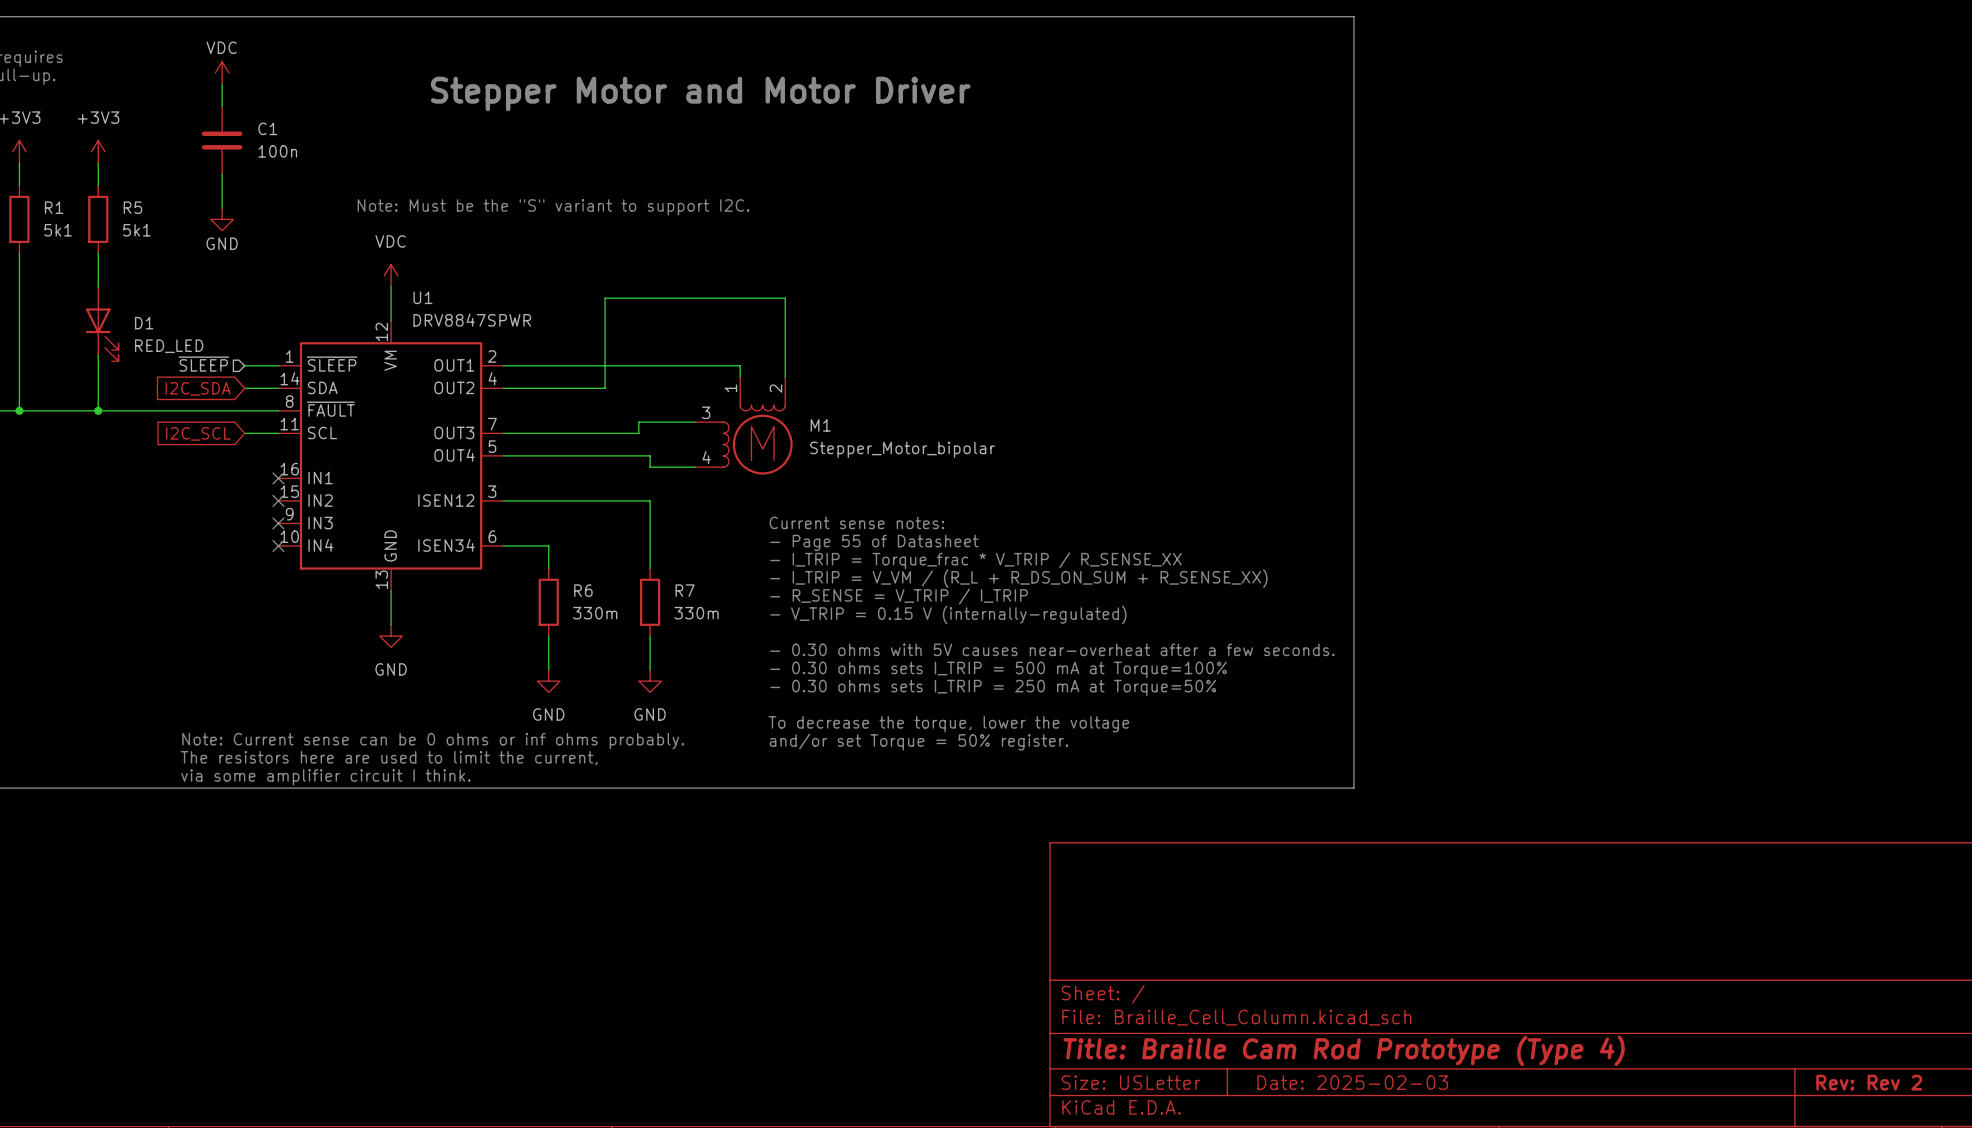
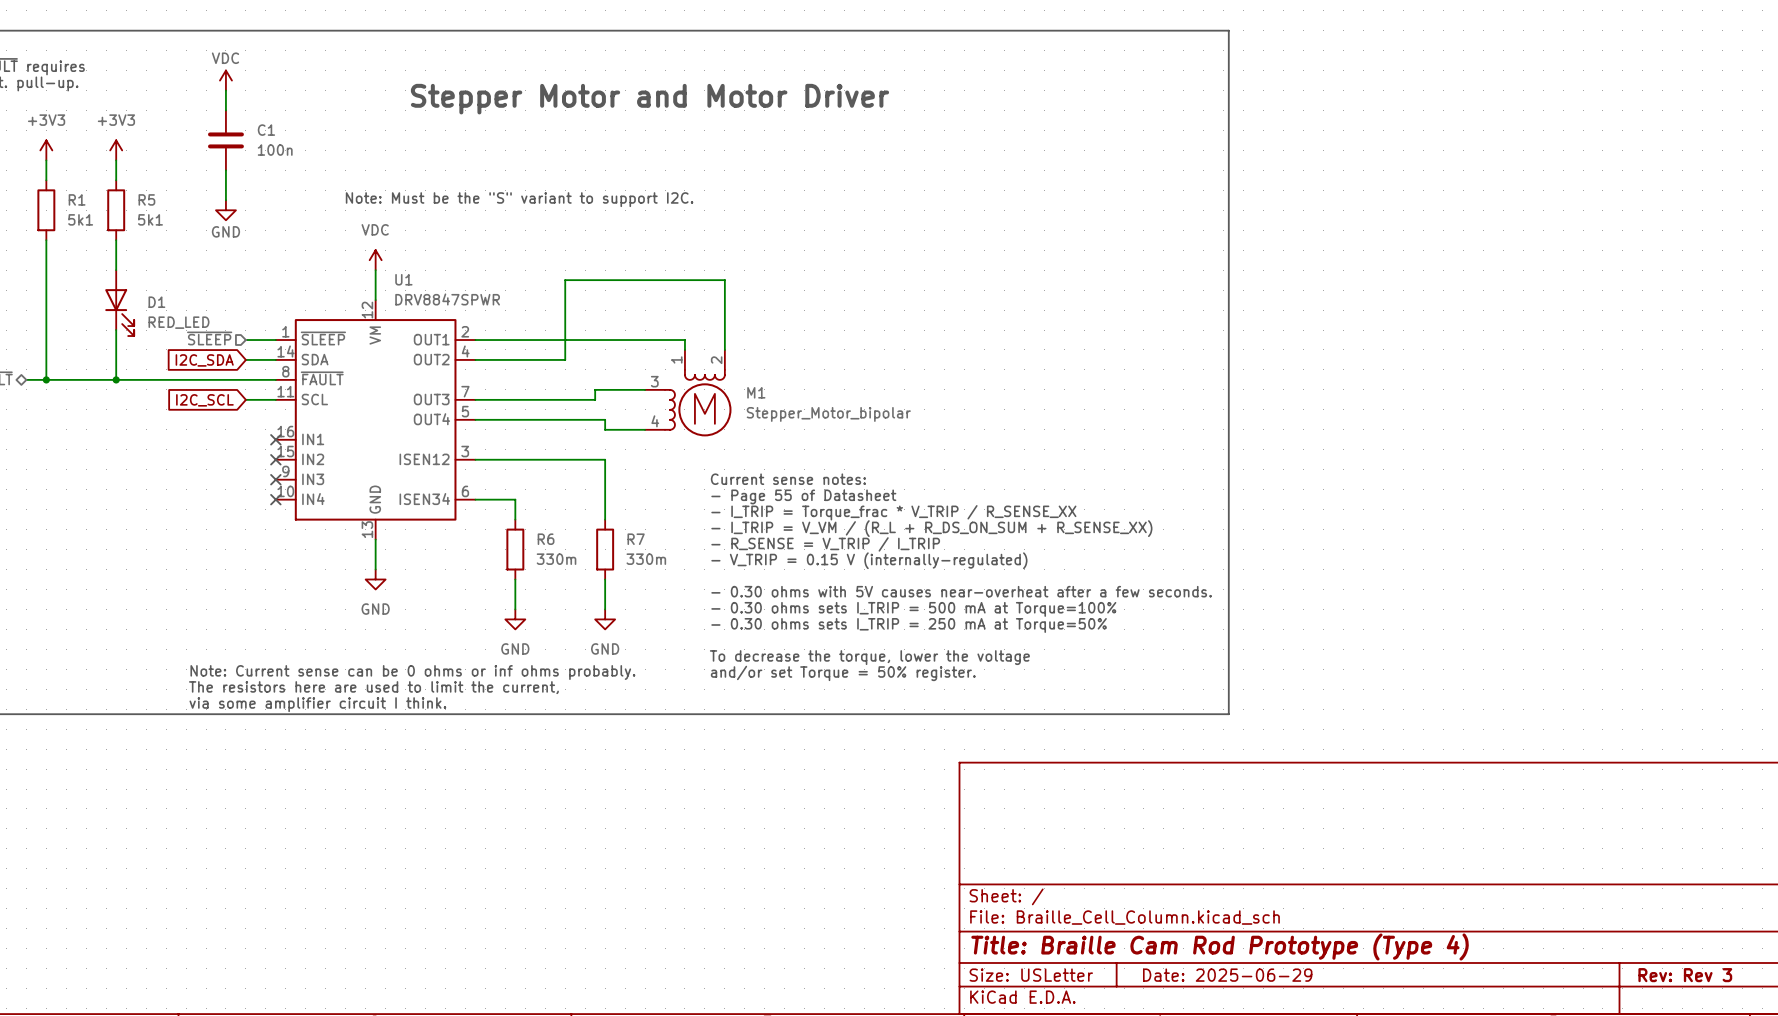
title block: Date: 2025-02-03 (1352, 1082) -> Date: 2025-06-29 (1227, 975)
title block: Rev: Rev 2 (1869, 1082) -> Rev: Rev 3 (1685, 975)

